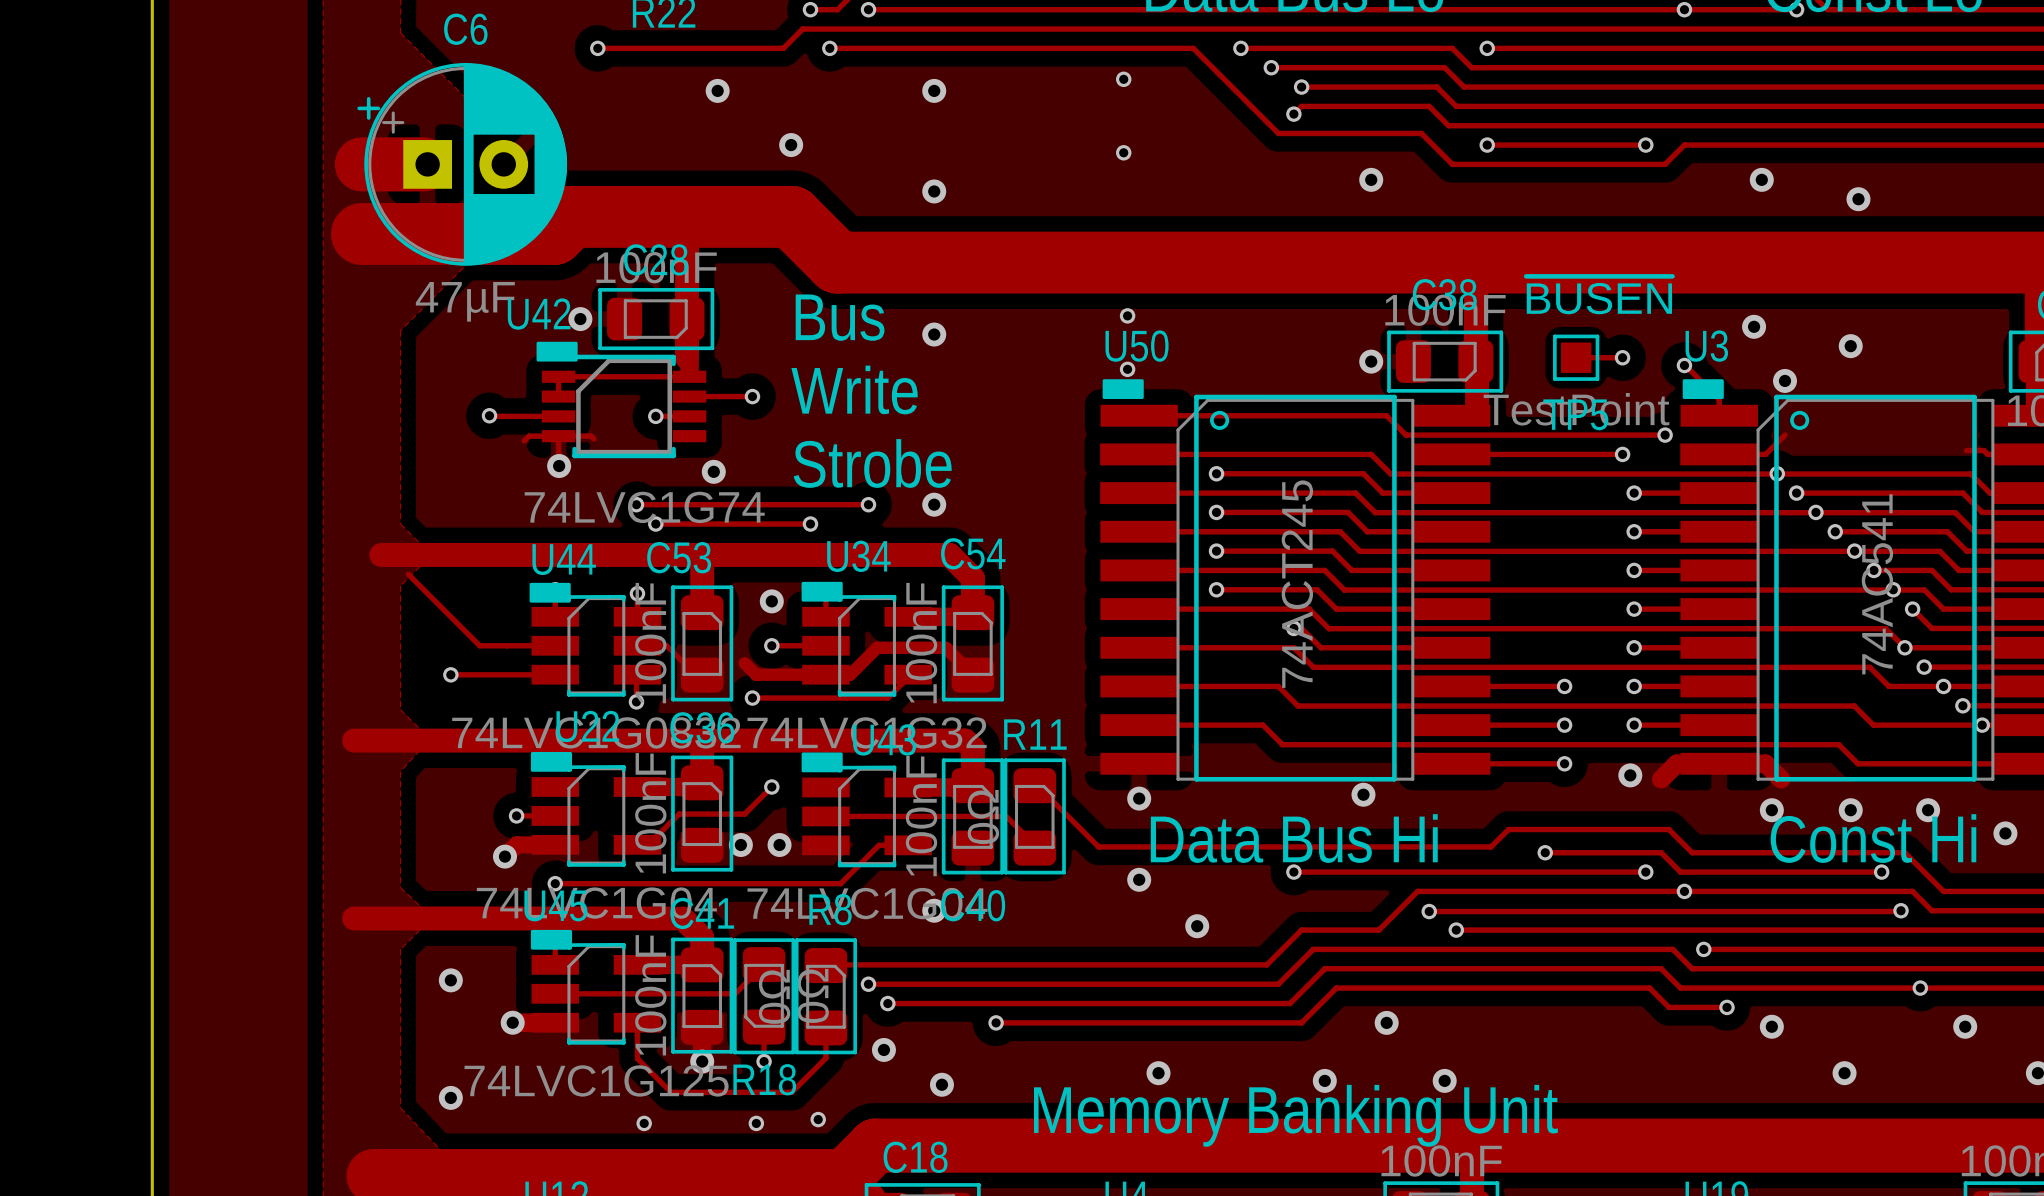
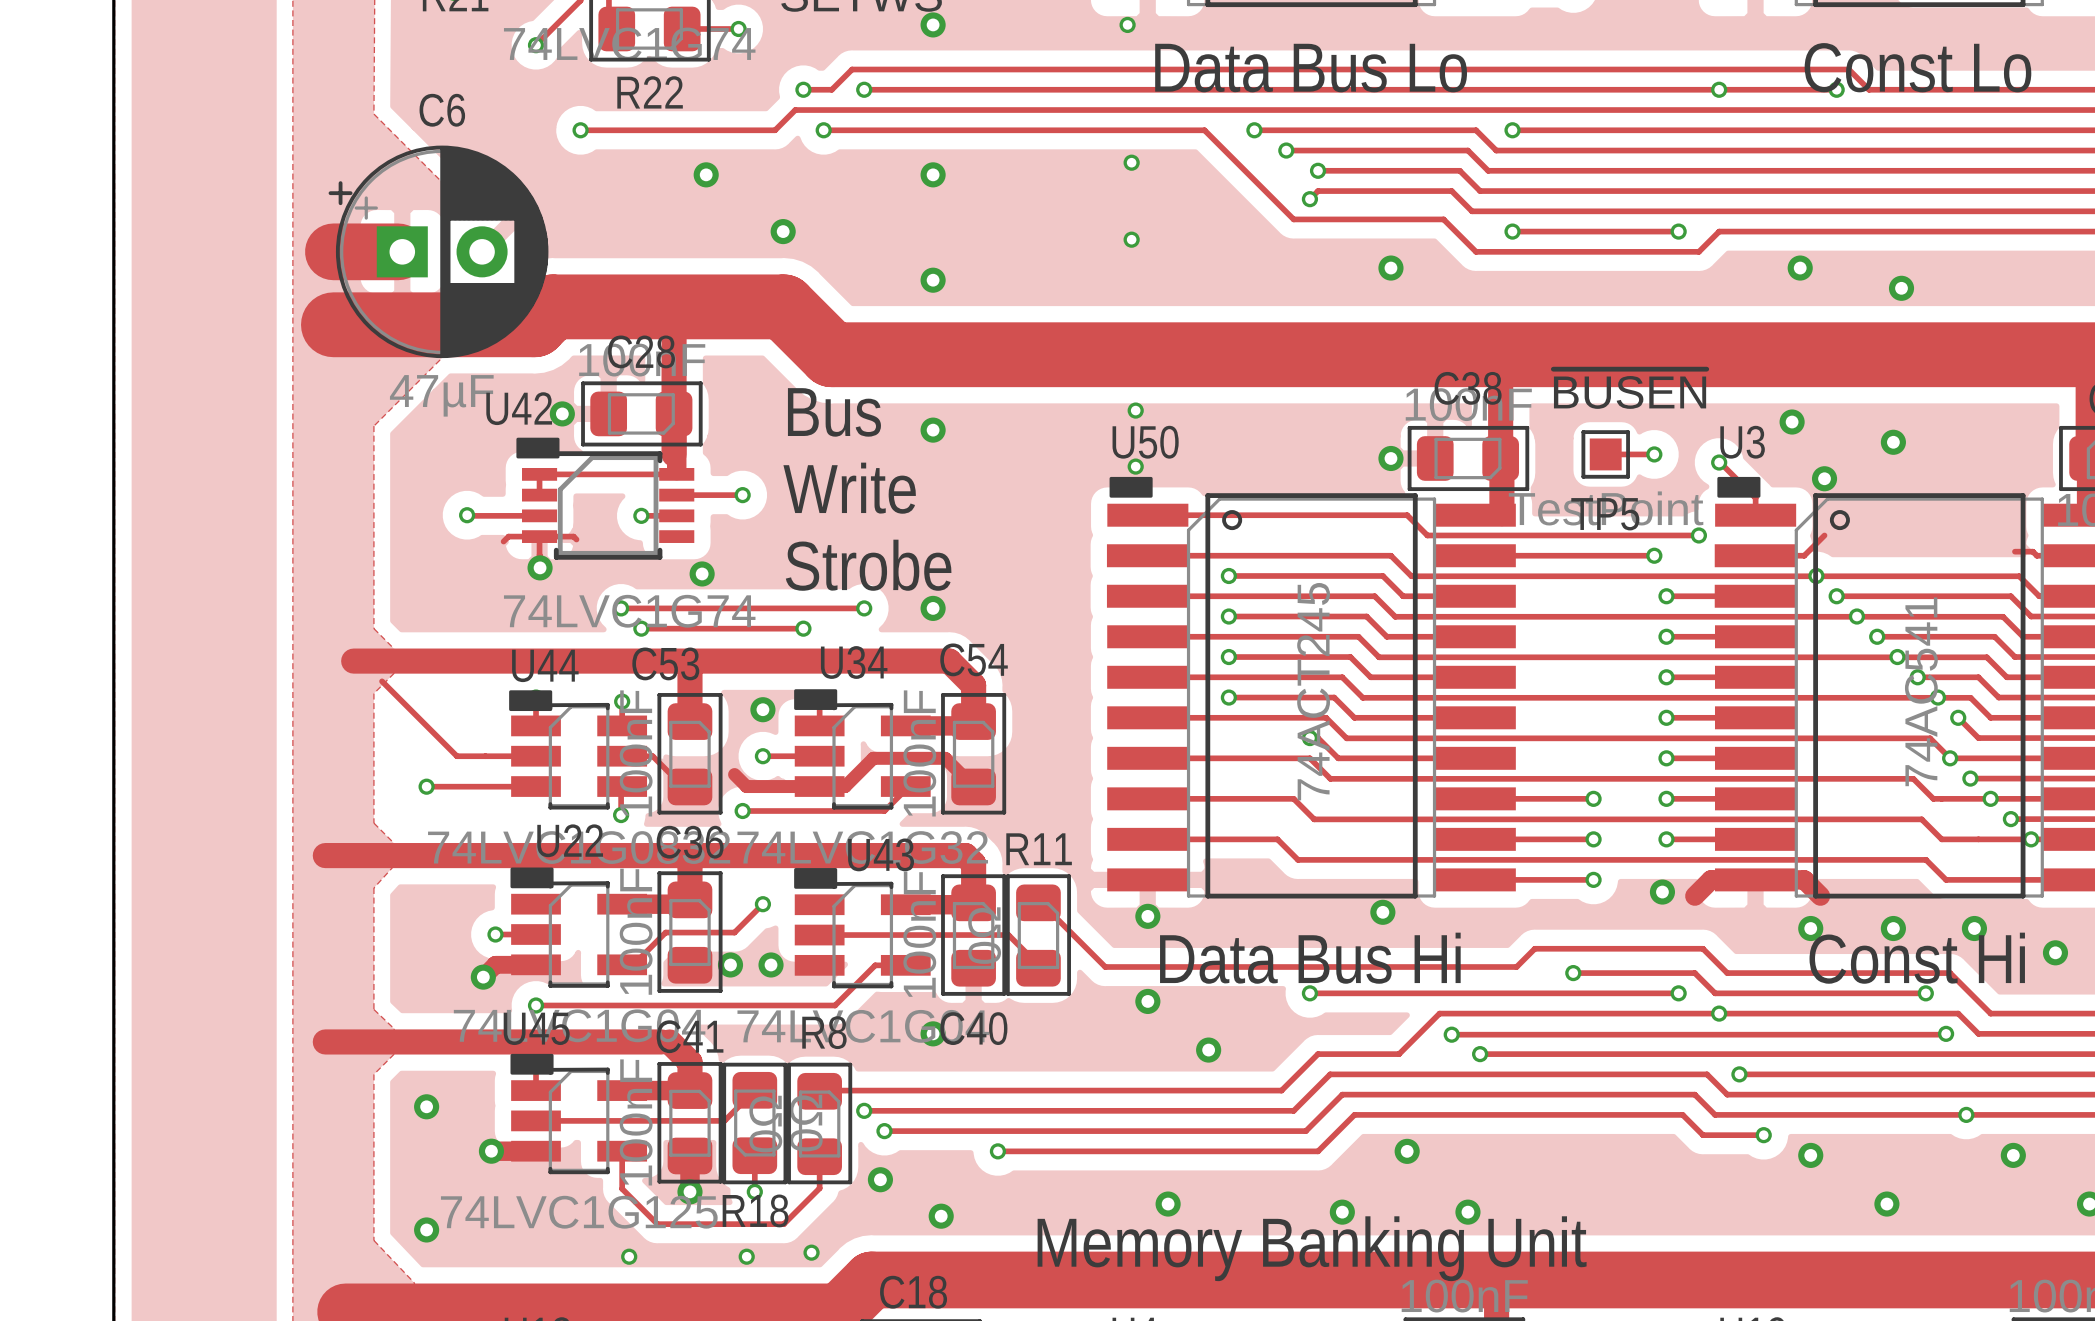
track: (1854, 706) (1873, 725) (1896, 725) -> (1897, 819) (1921, 819) (1941, 839)
track: (1838, 744) (1857, 763) (1901, 763) -> (1880, 859) (1926, 859) (1946, 879)

